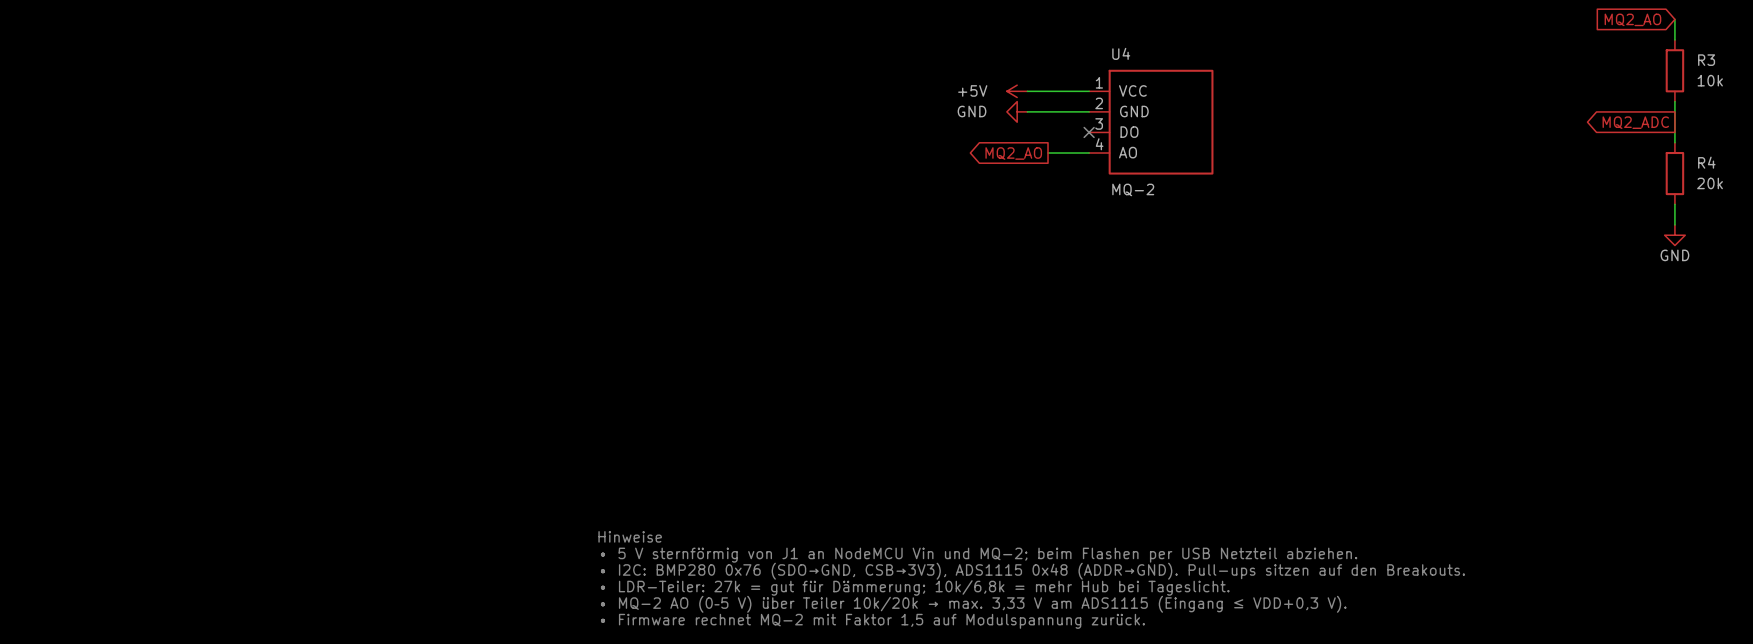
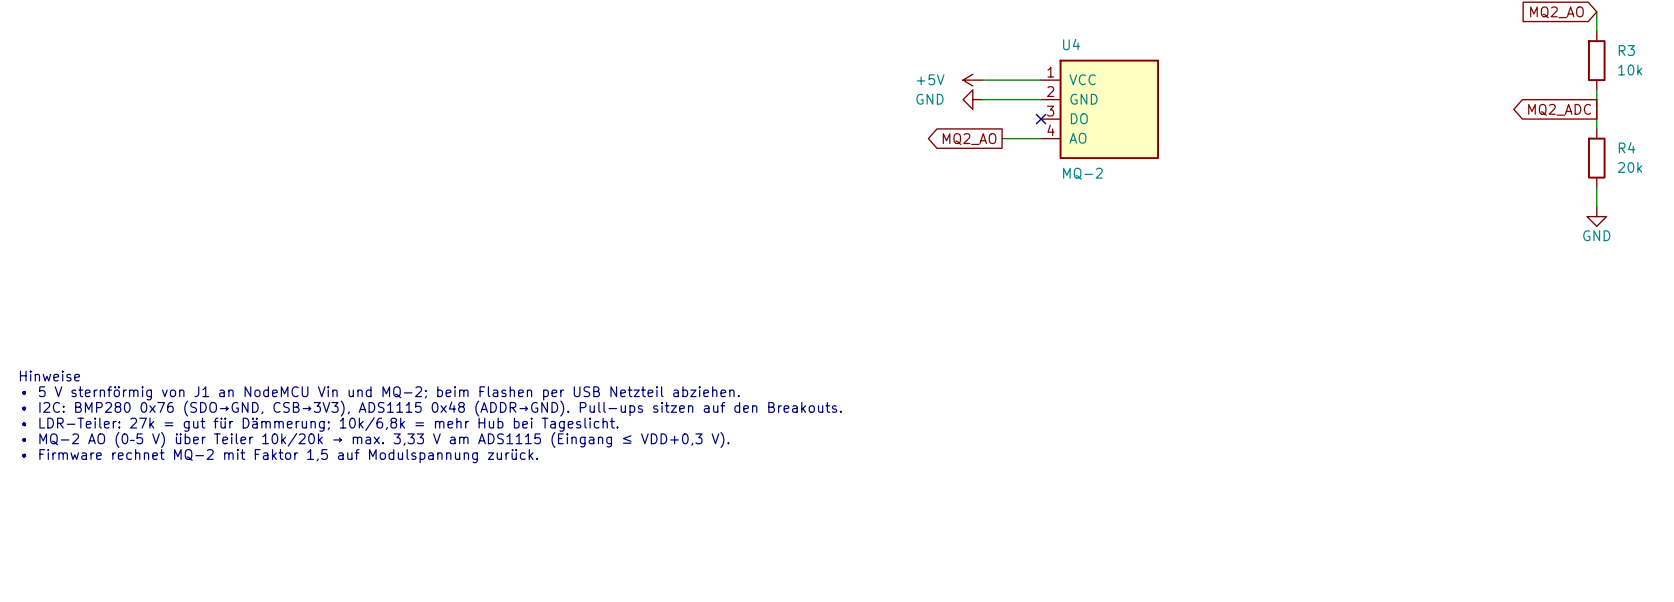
text: none -> Hinweise (49, 376)
text: none -> • 5 V sternförmig von J1 an NodeMCU Vin und MQ-2; beim Flashen per USB Netzteil abziehen. (380, 393)
text: none -> • I2C: BMP280 0x76 (SDO→GND, CSB→3V3), ADS1115 0x48 (ADDR→GND). Pull-ups sitzen auf den Breakouts. (432, 408)
text: none -> • LDR-Teiler: 27k = gut für Dämmerung; 10k/6,8k = mehr Hub bei Tageslicht. (320, 424)
text: none -> • MQ-2 AO (0–5 V) über Teiler 10k/20k → max. 3,33 V am ADS1115 (Eingang ≤ VDD+0,3 V). (375, 439)
text: none -> • Firmware rechnet MQ-2 mit Faktor 1,5 auf Modulspannung zurück. (280, 456)
text: Hinweise (630, 536) -> none
text: • 5 V sternförmig von J1 an NodeMCU Vin und MQ-2; beim Flashen per USB Netzteil abziehen. (979, 555) -> none
text: • I2C: BMP280 0x76 (SDO→GND, CSB→3V3), ADS1115 0x48 (ADDR→GND). Pull-ups sitzen auf den Breakouts. (1032, 571) -> none
text: • LDR-Teiler: 27k = gut für Dämmerung; 10k/6,8k = mehr Hub bei Tageslicht. (915, 587) -> none
text: • MQ-2 AO (0–5 V) über Teiler 10k/20k → max. 3,33 V am ADS1115 (Eingang ≤ VDD+0,3 V). (973, 604) -> none
text: • Firmware rechnet MQ-2 mit Faktor 1,5 auf Modulspannung zurück. (872, 621) -> none

